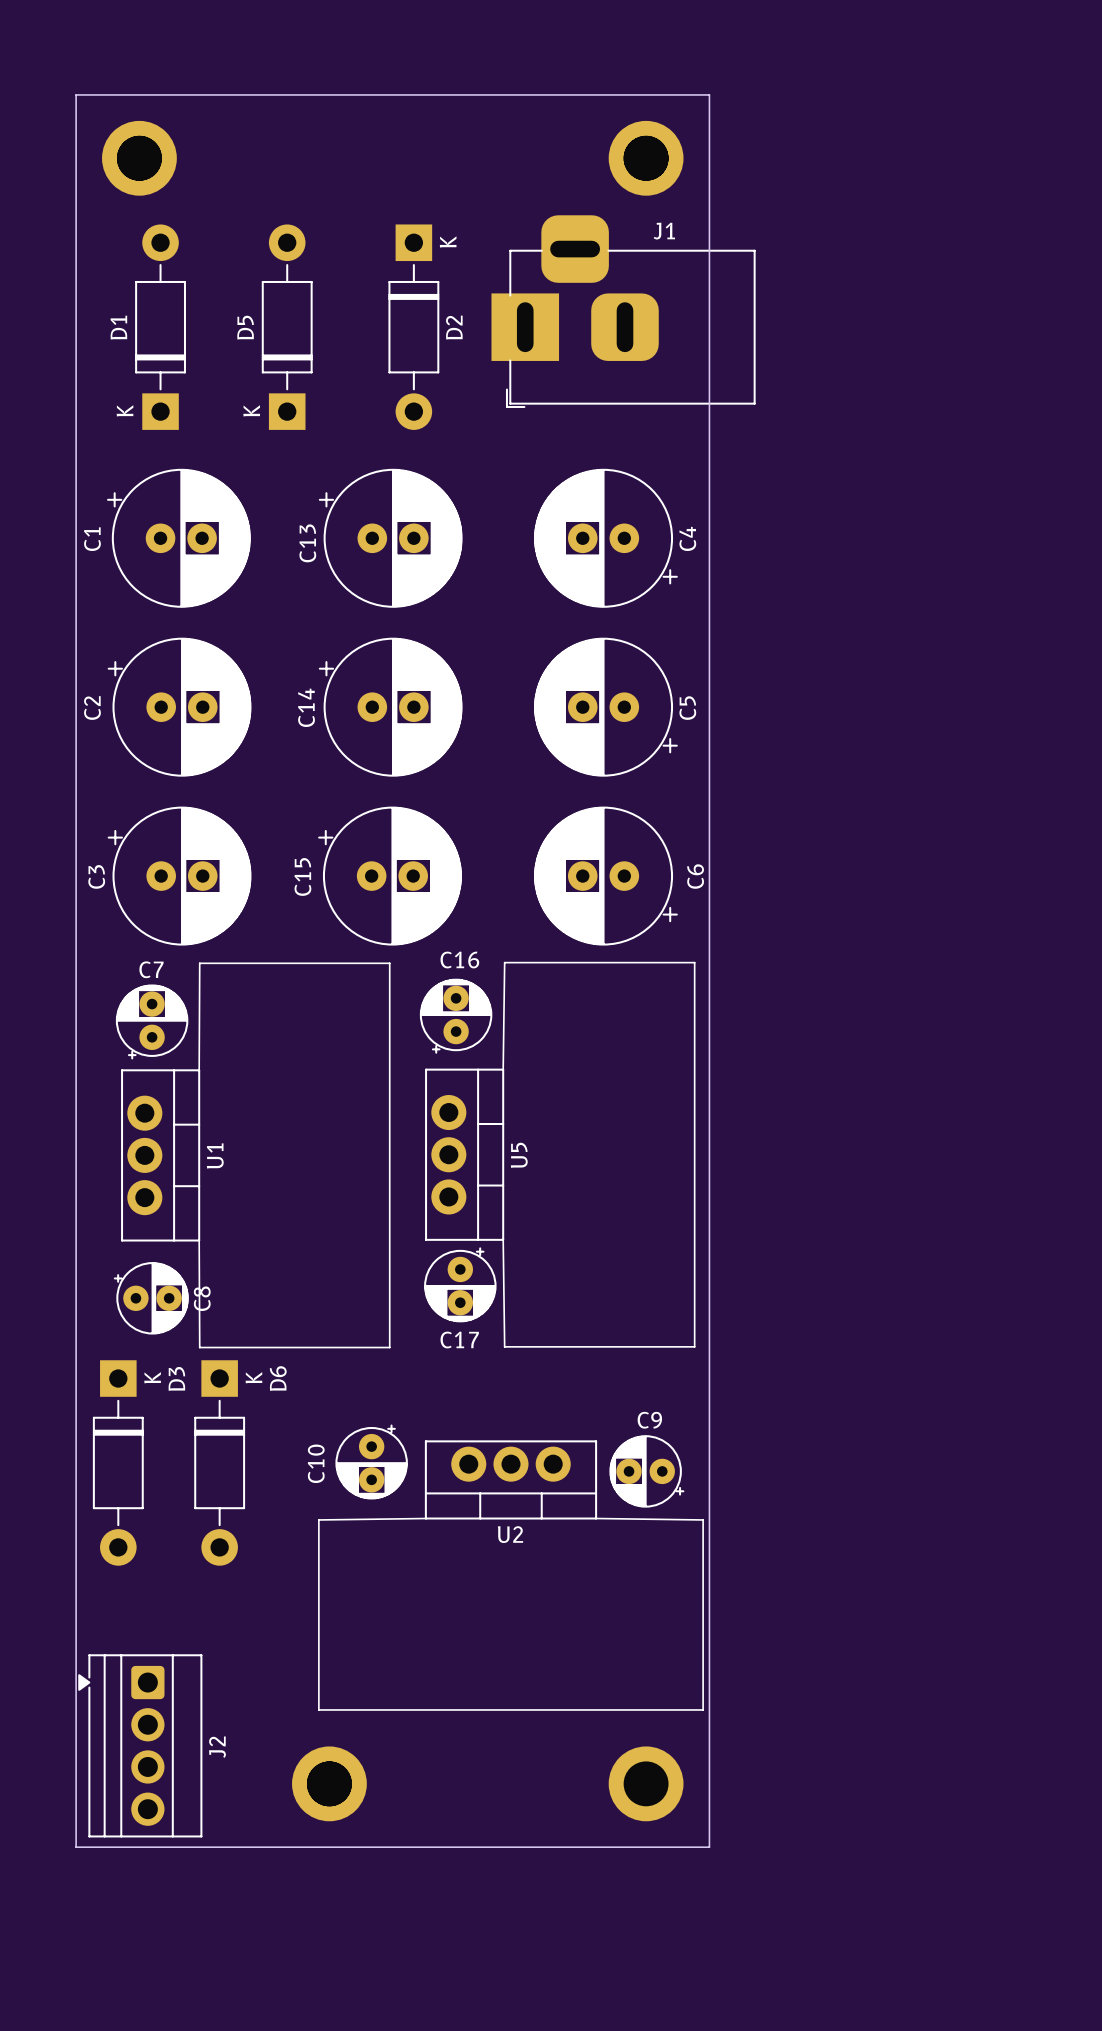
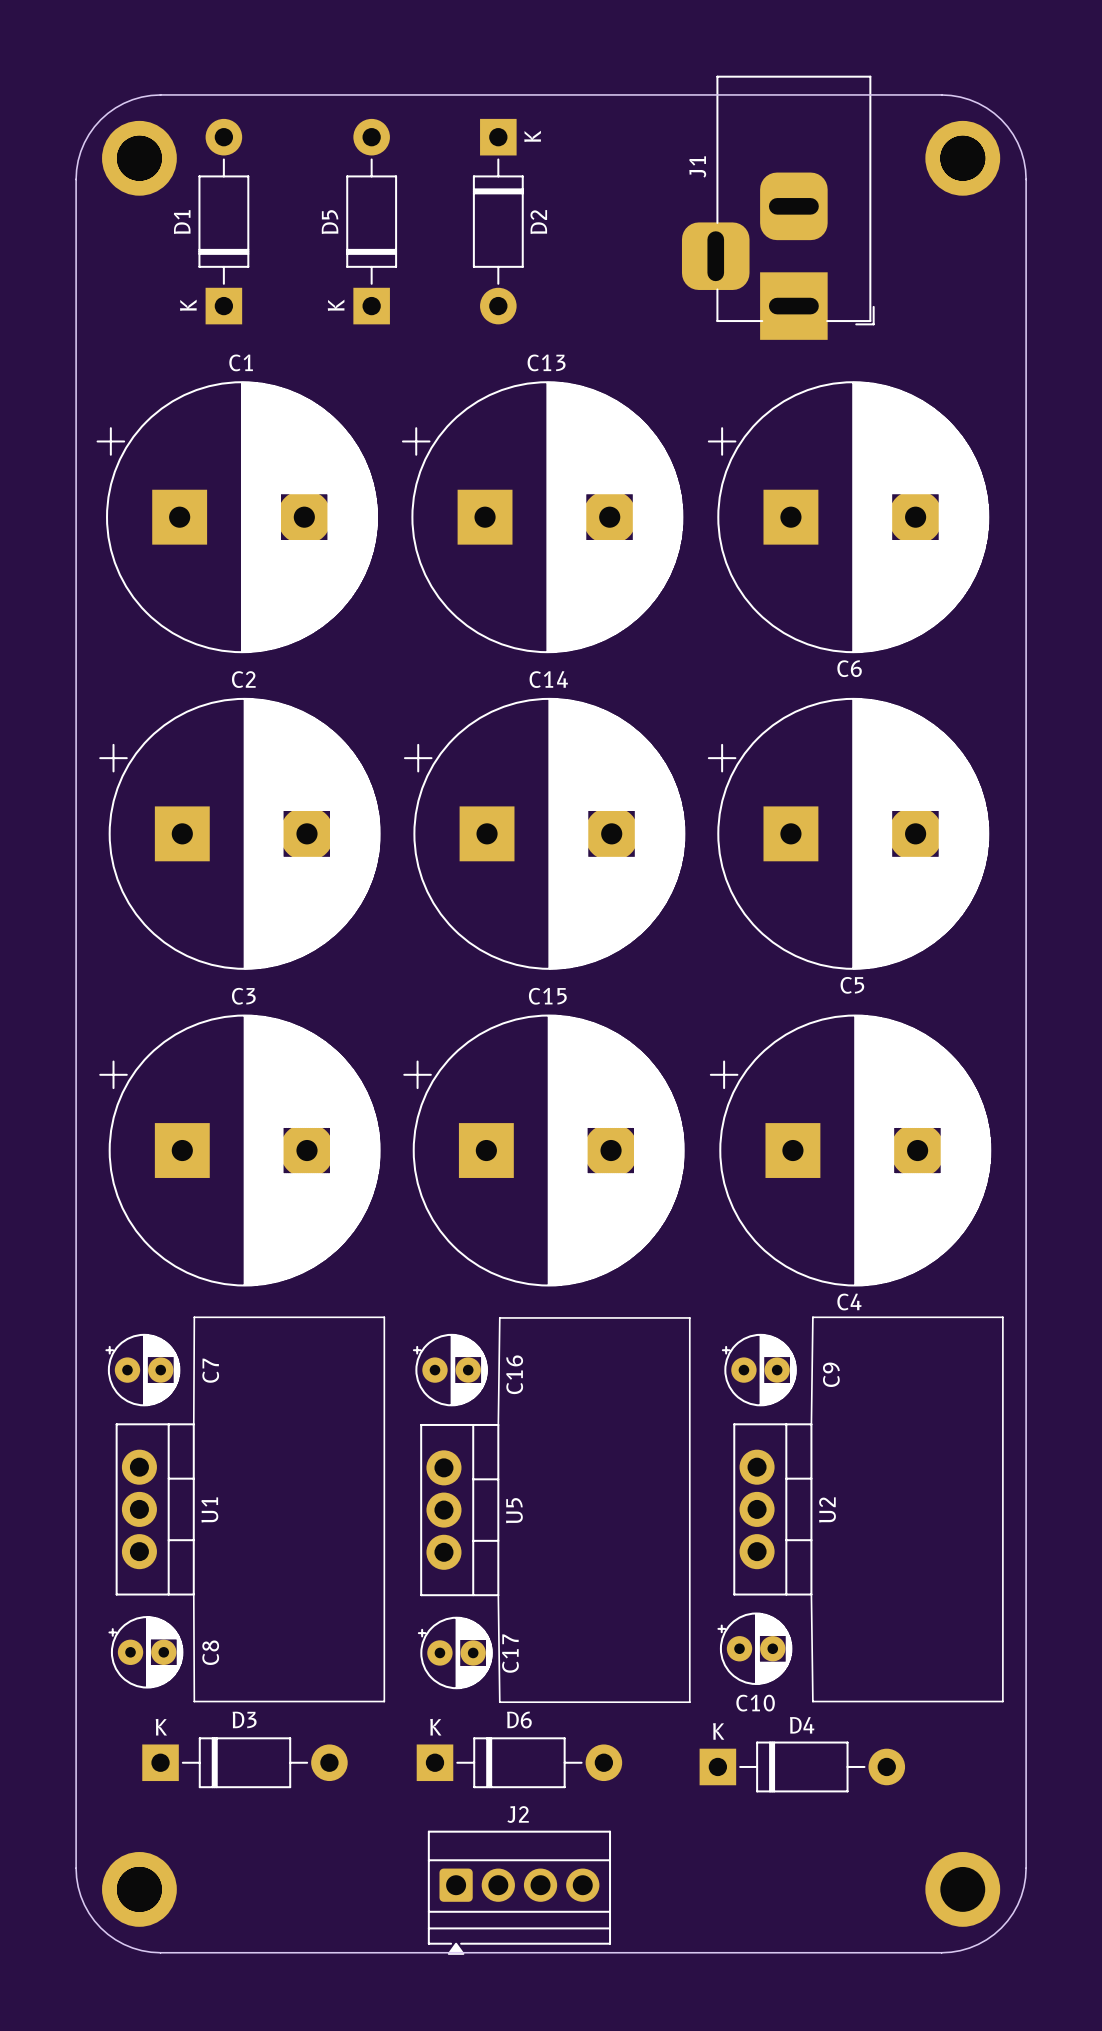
board edge: (160, 94) (76, 94) (76, 179) -> (160, 94) (141, 97) (123, 103) (100, 119) (89, 134) (80, 151) (76, 179)
board edge: (709, 94) (709, 1847) (76, 1847) -> (709, 94) (941, 94) (960, 97) (986, 107) (1001, 119) (1013, 134) (1023, 160) (1026, 179) (1026, 1868) (1021, 1896) (1013, 1913) (994, 1934) (969, 1948) (951, 1952) (160, 1952) (141, 1950) (123, 1944) (107, 1934) (94, 1920) (84, 1904) (78, 1887) (76, 1847)
part position: (646, 158) -> (962, 158)
part position: (646, 158) -> (962, 158)
J1 rotation: 0° (623, 311) -> 90° counterclockwise (778, 207)
J1 position: (623, 311) -> (778, 207)
D1 position: (160, 327) -> (223, 221)
D5 position: (287, 327) -> (371, 221)
D2 position: (413, 327) -> (498, 221)
C1 footprint: [107, 468, 251, 608] -> [96, 381, 378, 654]
C13 footprint: [318, 468, 463, 608] -> [401, 381, 684, 654]
C4 footprint: [534, 468, 678, 608] -> [709, 1014, 992, 1287]
C4 name position: C4 (687, 538) -> C4 (849, 1302)
C1 name position: C1 (92, 539) -> C1 (241, 362)
C13 name position: C13 (307, 543) -> C13 (546, 362)
C2 footprint: [107, 637, 252, 777] -> [99, 697, 381, 970]
C14 footprint: [318, 637, 463, 777] -> [403, 697, 686, 970]
C5 footprint: [534, 637, 678, 777] -> [707, 697, 990, 970]
C14 name position: C14 (306, 707) -> C14 (548, 679)
C2 name position: C2 (92, 708) -> C2 (243, 679)
C5 name position: C5 (687, 708) -> C5 (852, 985)
C3 footprint: [107, 806, 252, 946] -> [99, 1014, 381, 1287]
C15 footprint: [318, 806, 462, 946] -> [403, 1014, 685, 1287]
C6 footprint: [534, 806, 678, 946] -> [707, 381, 990, 654]
C3 name position: C3 (96, 876) -> C3 (243, 996)
C15 name position: C15 (302, 876) -> C15 (547, 996)
C6 name position: C6 (695, 876) -> C6 (849, 668)
C16 rotation: 0° (456, 1016) -> 90° clockwise (450, 1370)
C16 position: (456, 1016) -> (450, 1370)
C7 rotation: 0° (152, 1021) -> 90° clockwise (142, 1370)
C7 position: (152, 1021) -> (142, 1370)
line: (503, 1069) (504, 962) (694, 962) (694, 1346) (504, 1346) (503, 1239) -> (498, 1424) (499, 1317) (689, 1317) (689, 1702) (499, 1702) (498, 1595)
line: (199, 1070) (199, 963) (389, 963) (389, 1347) (199, 1347) (199, 1240) -> (193, 1424) (194, 1317) (384, 1317) (384, 1701) (194, 1701) (193, 1594)
U5 position: (464, 1154) -> (459, 1510)
U1 position: (160, 1155) -> (155, 1509)
C17 rotation: 0° (460, 1284) -> 90° counterclockwise (455, 1652)
C17 position: (460, 1284) -> (455, 1652)
C8 position: (151, 1298) -> (145, 1652)
C8 name position: C8 (202, 1298) -> C8 (210, 1652)
D3 name position: D3 (176, 1378) -> D3 (244, 1719)
D6 name position: D6 (278, 1378) -> D6 (519, 1720)
C9 name position: C9 (649, 1420) -> C9 (831, 1374)
line: none -> (811, 1424) (812, 1317) (1002, 1317) (1002, 1701) (812, 1701) (811, 1594)
C10 rotation: 0° (371, 1461) -> 90° counterclockwise (754, 1648)
C10 position: (371, 1461) -> (754, 1648)
D3 rotation: 0° (118, 1462) -> 90° counterclockwise (244, 1762)
D3 position: (118, 1462) -> (244, 1762)
D6 rotation: 0° (219, 1462) -> 90° counterclockwise (519, 1762)
D6 position: (219, 1462) -> (519, 1762)
C9 rotation: 0° (646, 1471) -> 180° (759, 1370)
C9 position: (646, 1471) -> (759, 1370)
U2 rotation: 0° (510, 1479) -> 90° counterclockwise (772, 1509)
U2 position: (510, 1479) -> (772, 1509)
line: (425, 1518) (318, 1519) (318, 1709) (703, 1709) (703, 1519) (596, 1518) -> none
J2 rotation: 0° (140, 1745) -> 90° counterclockwise (519, 1892)
J2 position: (140, 1745) -> (519, 1892)
D4: none -> (802, 1766)
part position: (329, 1783) -> (139, 1889)
part position: (329, 1783) -> (139, 1889)
part: (646, 1783) -> none
part: none -> (962, 1889)

